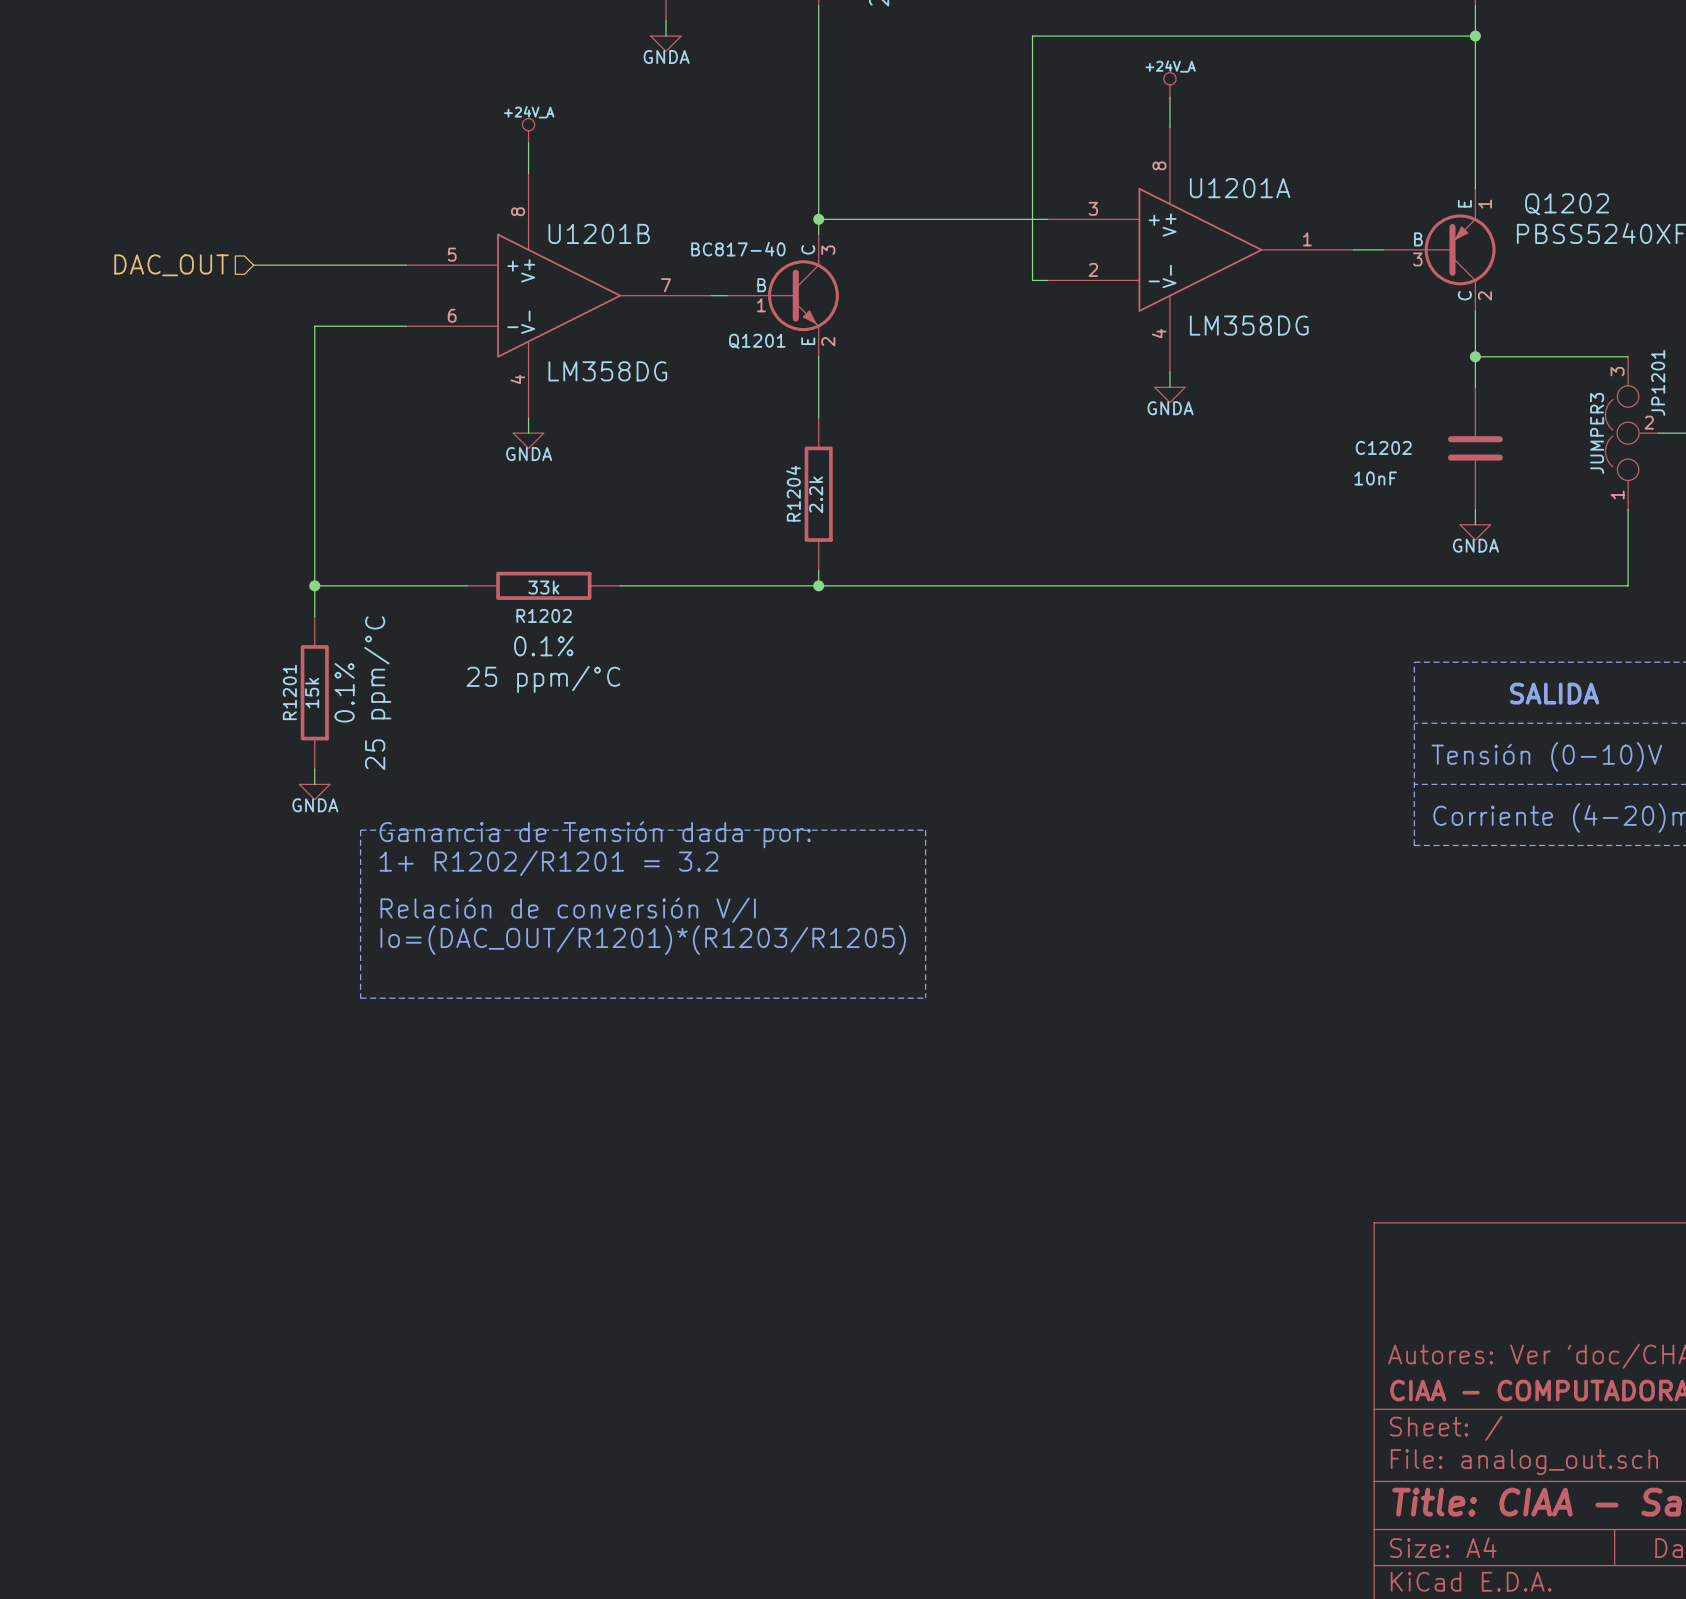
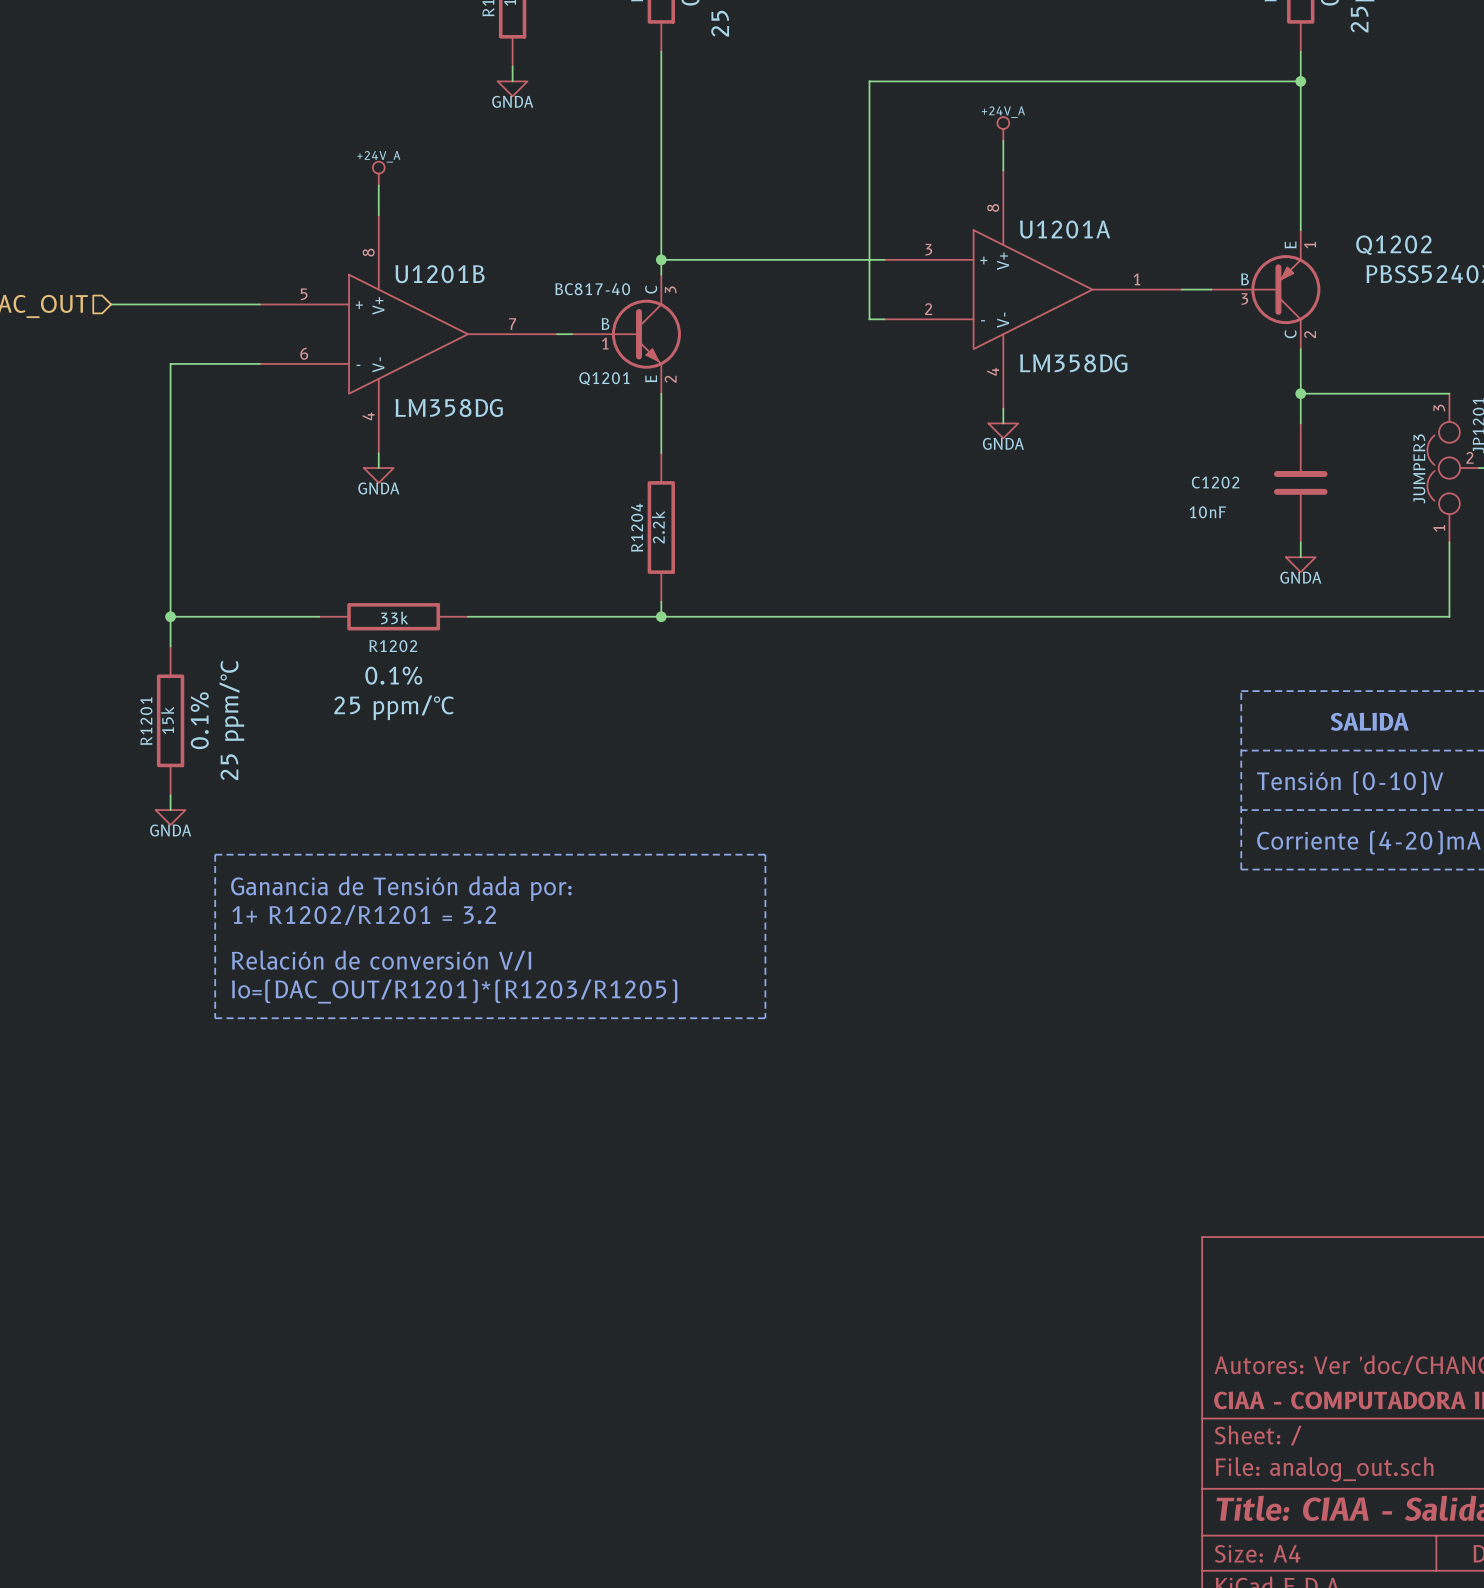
text: Ganancia de Tensión dada por: (595, 834) -> none
text: 1+ R1202/R1201 = 3.2 (548, 863) -> Ganancia de Tensión dada por: (401, 888)
text: none -> 1+ R1202/R1201 = 3.2 (364, 915)
text: Relación de conversión V/I (568, 910) -> none
text: Io=(DAC_OUT/R1201)*(R1203/R1205) (643, 940) -> Relación de conversión V/I (381, 960)
text: none -> Io=(DAC_OUT/R1201)*(R1203/R1205) (454, 991)

